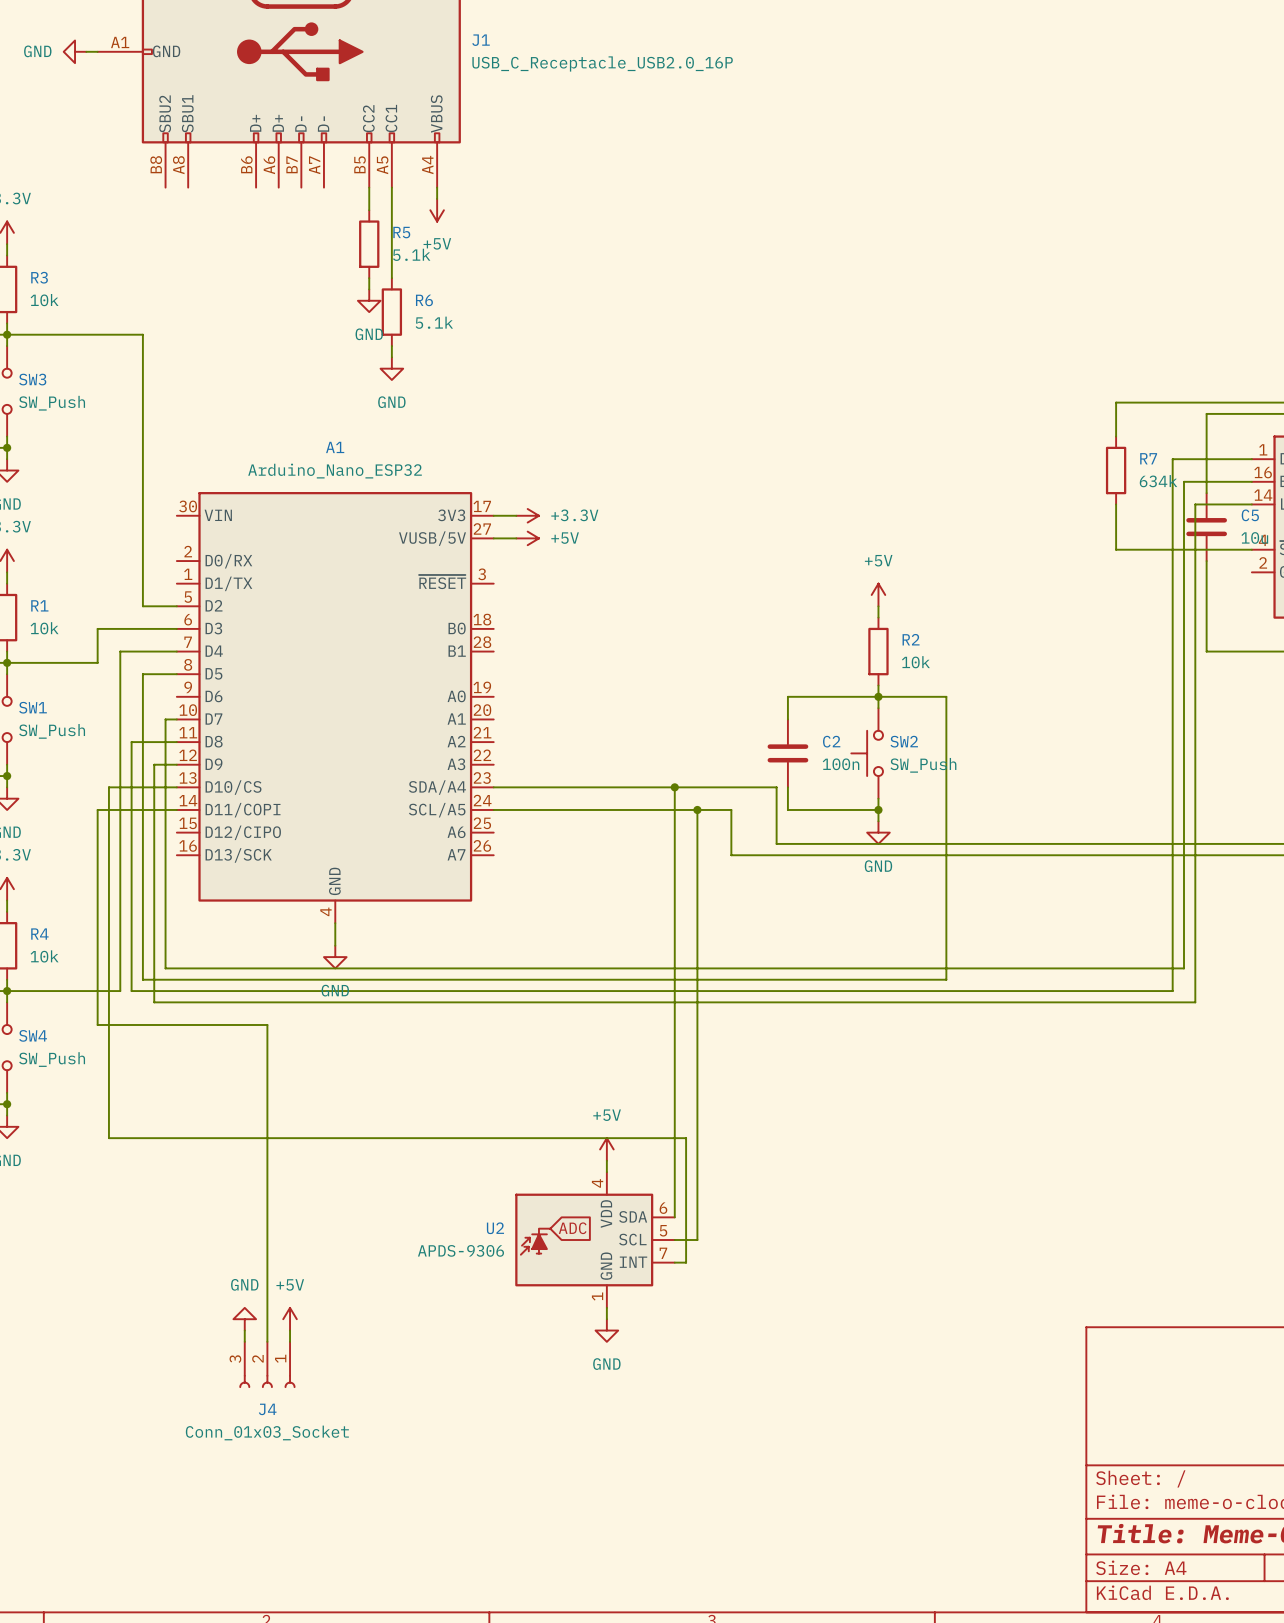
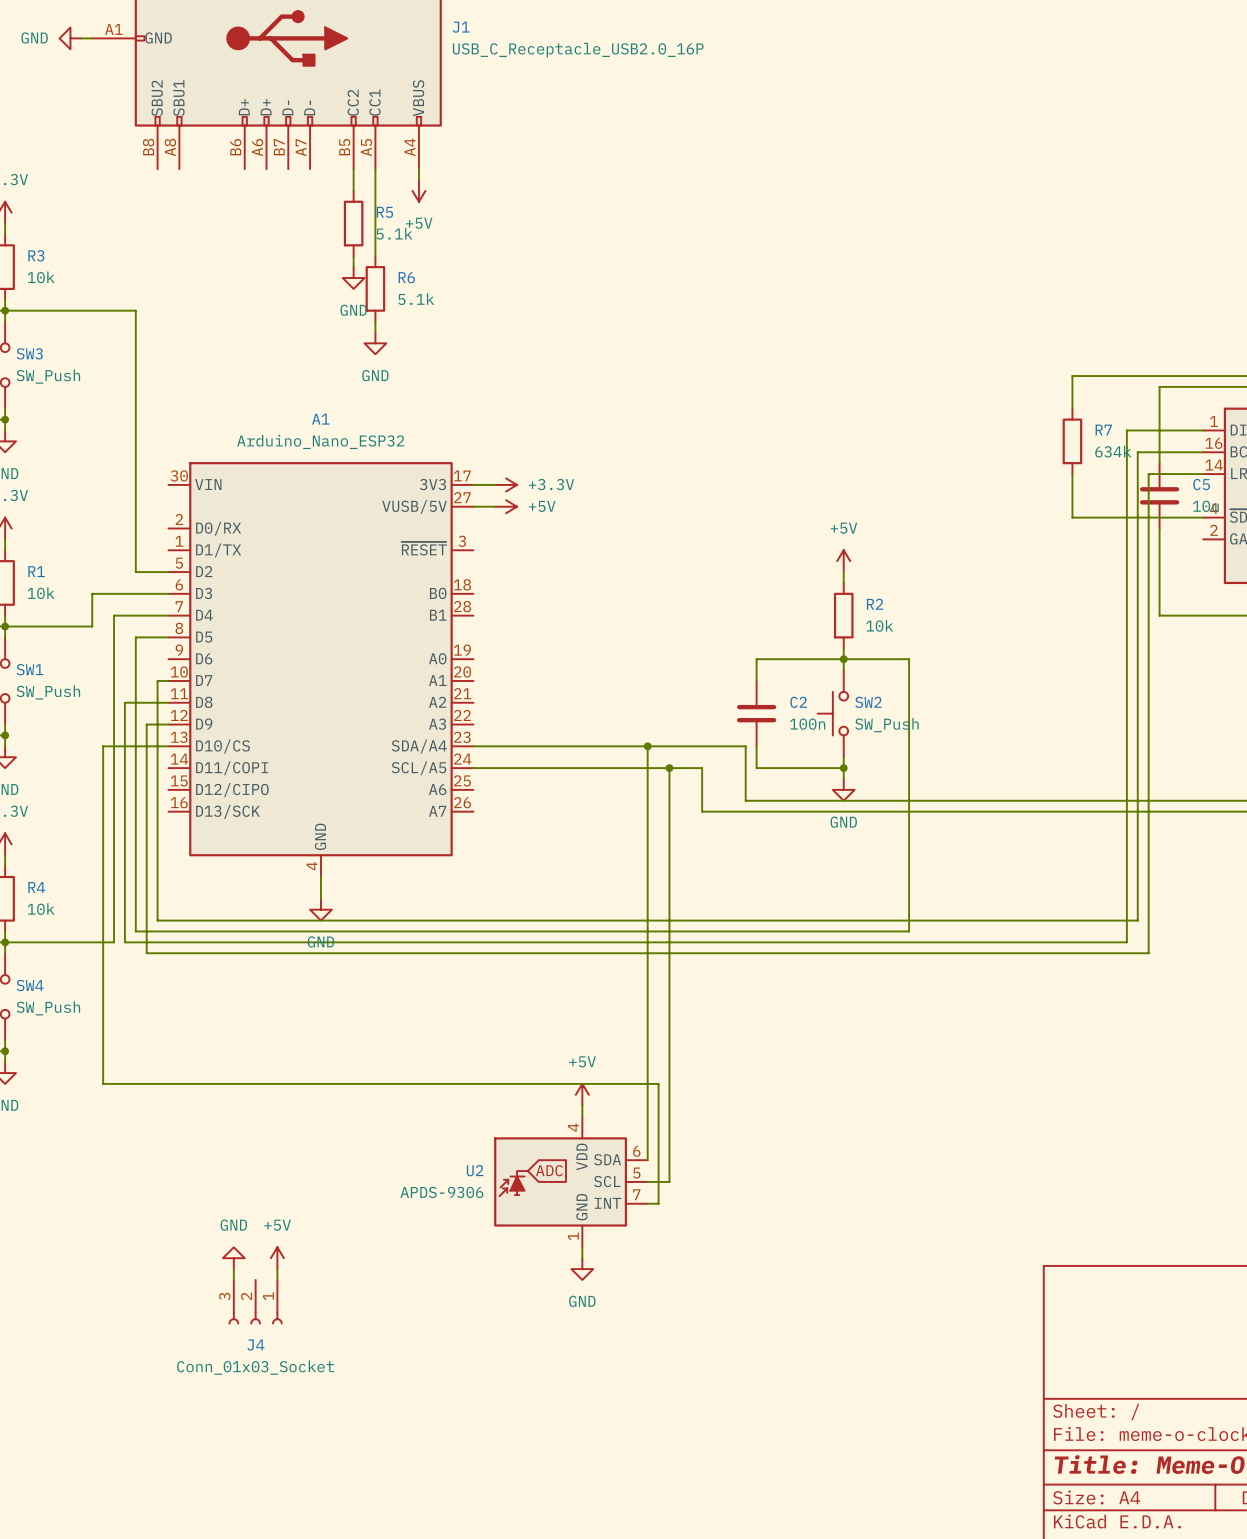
wire: (176, 809) (97, 809) (97, 1024) (267, 1024) (267, 1341) -> none

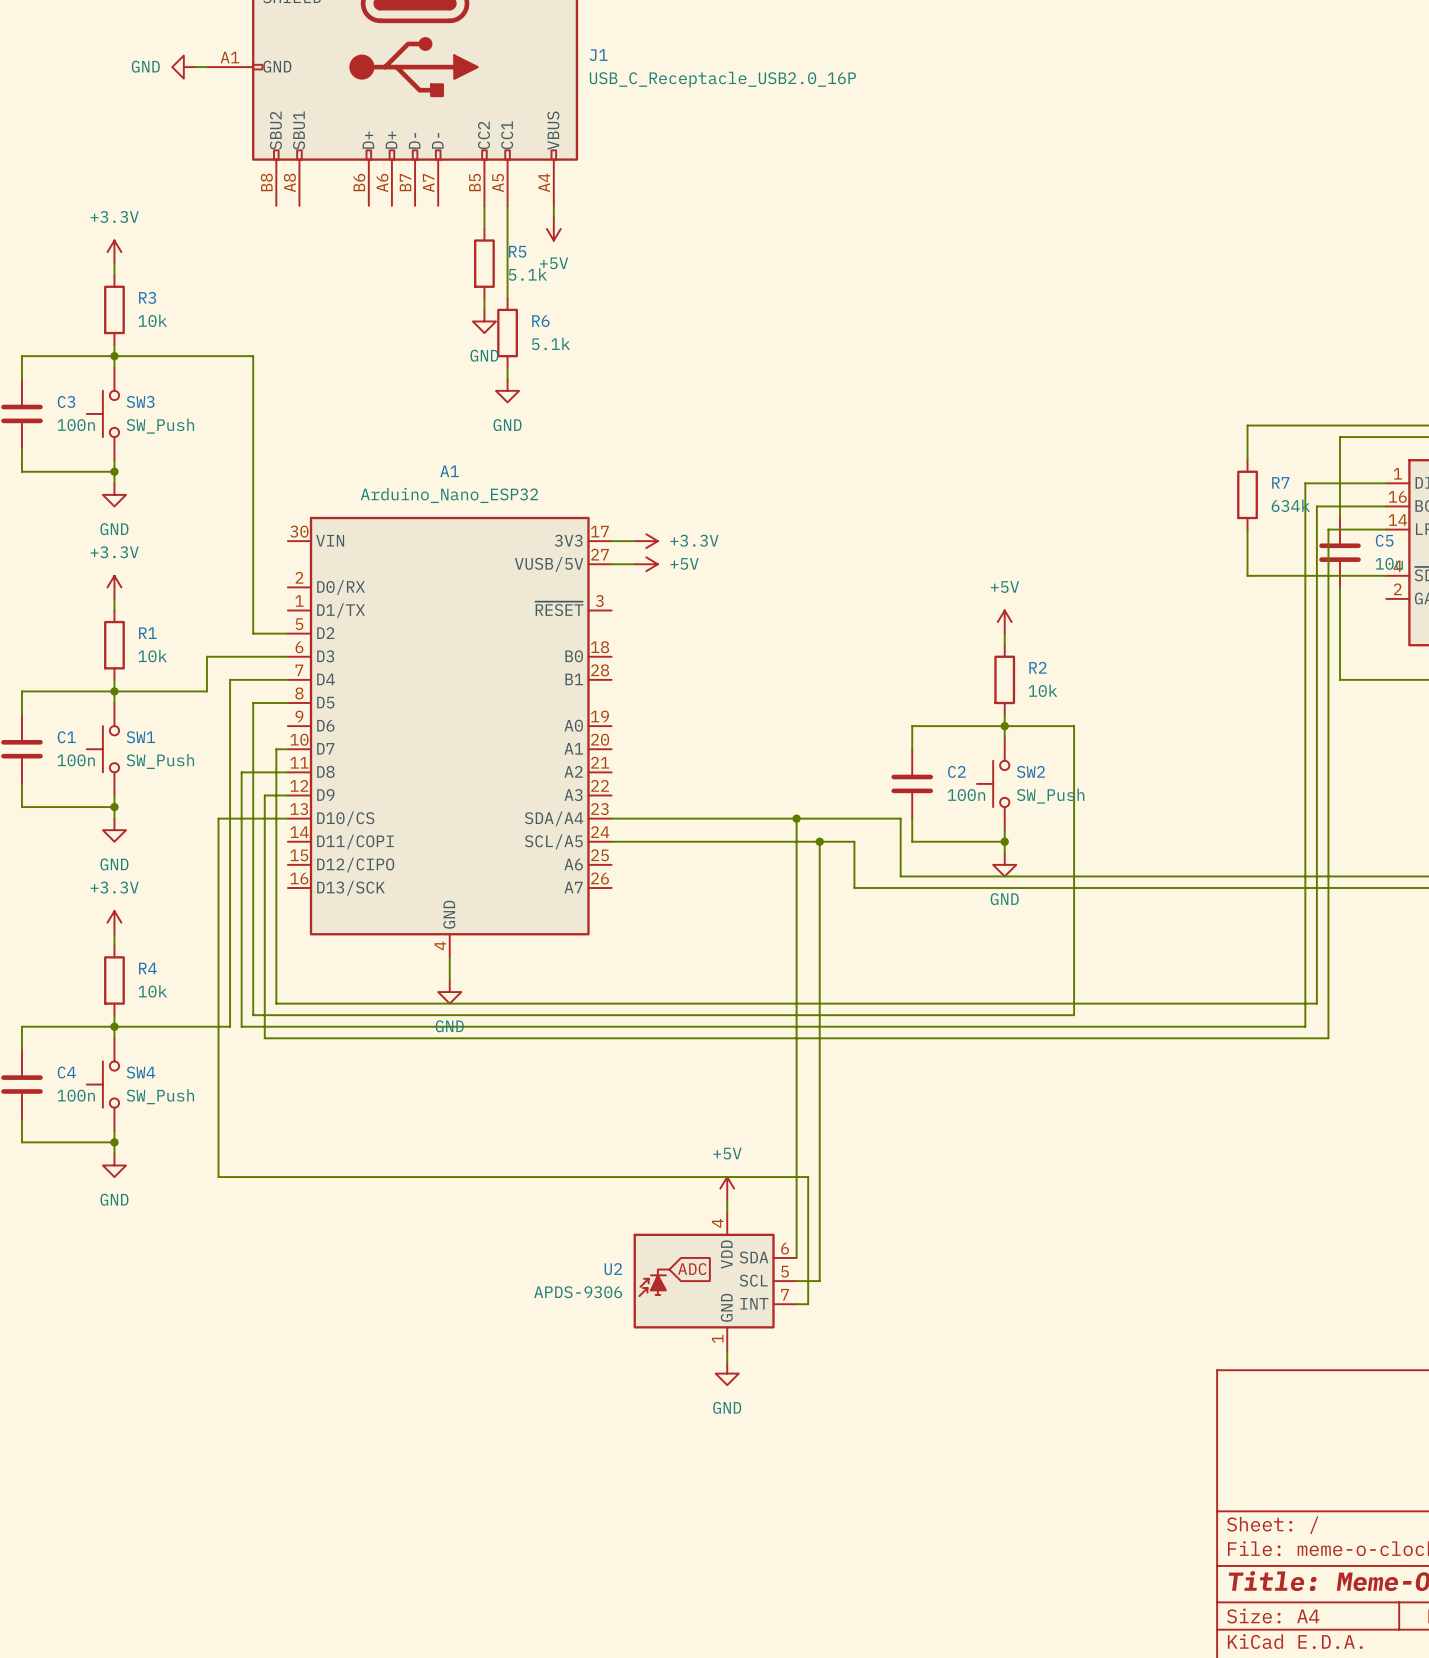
power symbol: GND (233, 1258) -> none
power symbol: +5V (277, 1258) -> none
wire: (233, 1269) (233, 1279) -> none
wire: (277, 1269) (277, 1279) -> none
J4: Conn_01x03_Socket (255, 1302) -> none

